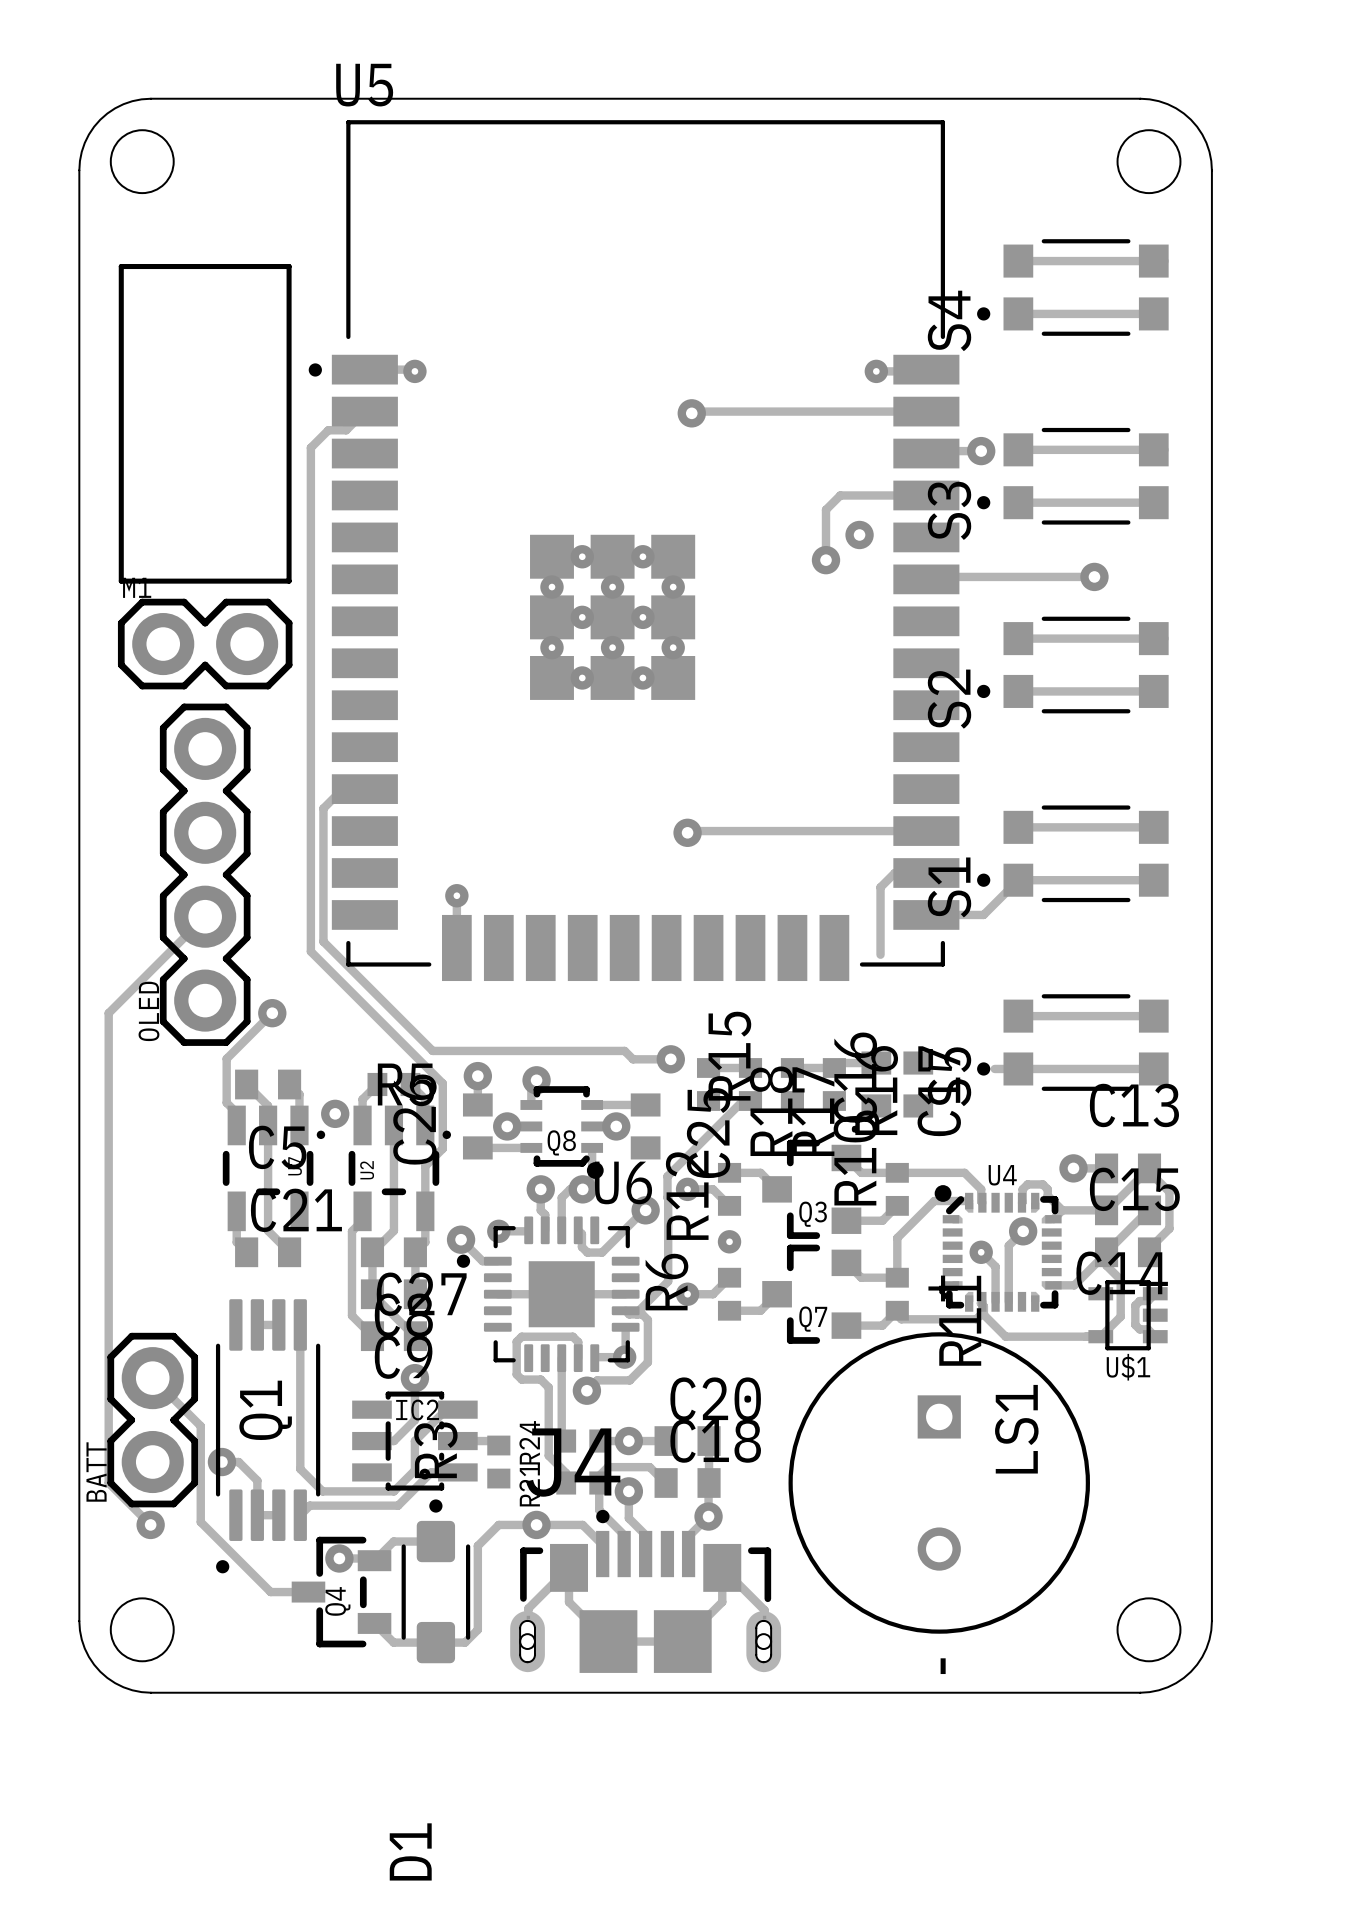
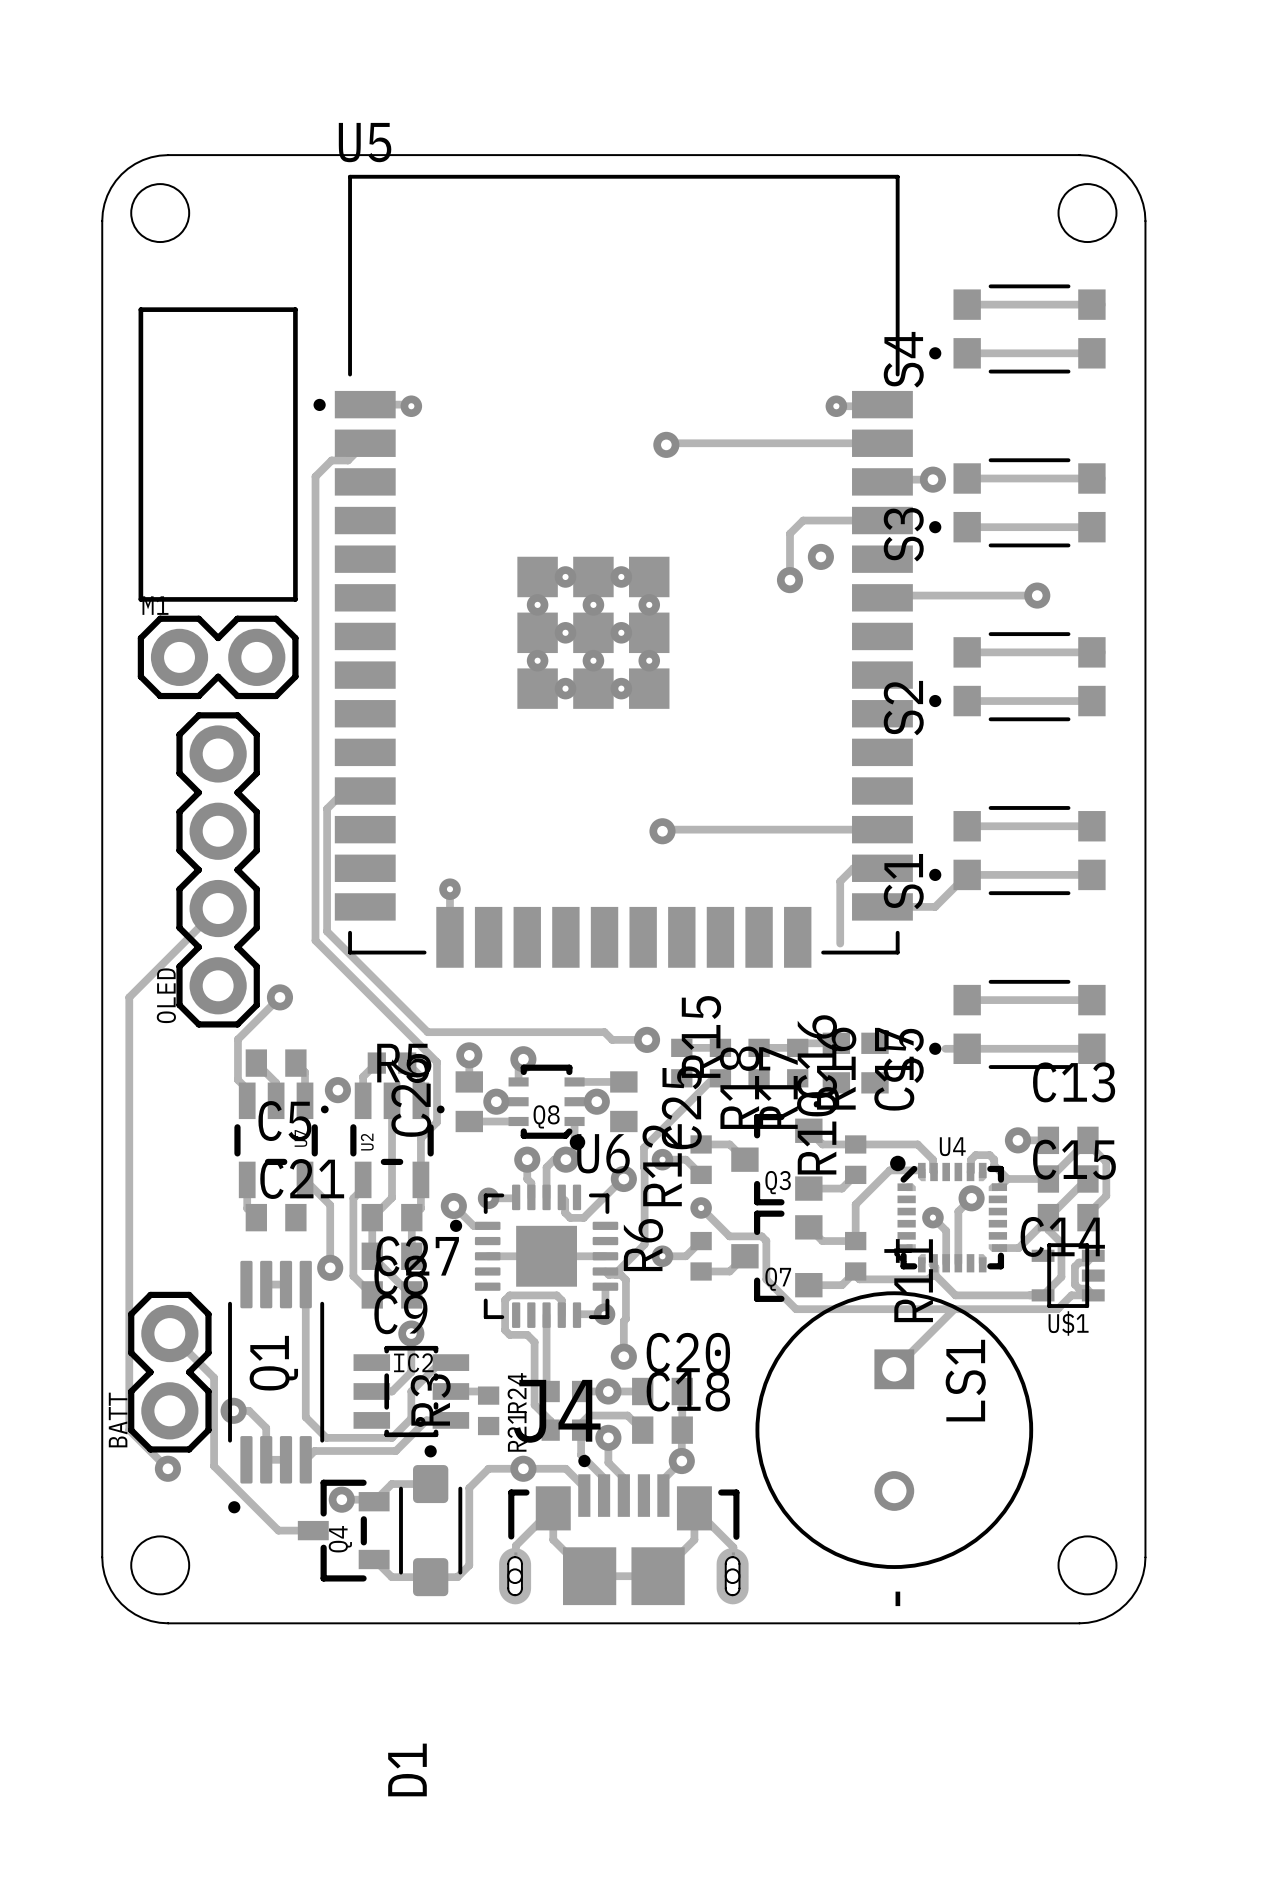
track: (268, 1125) (268, 1230) (289, 1252) -> none
track: none -> (305, 1179) (330, 1205) (330, 1267)
track: none -> (701, 1207) (729, 1236) (761, 1236) (766, 1240) (766, 1279) (796, 1309) (1057, 1309) (1071, 1295) (1093, 1295)
via: none -> (330, 1267)
track: none -> (954, 1309) (894, 1369)
track: (645, 1364) (629, 1380) (597, 1380) (586, 1390) -> (623, 1321) (623, 1356)
via position: (586, 1390) -> (623, 1356)

